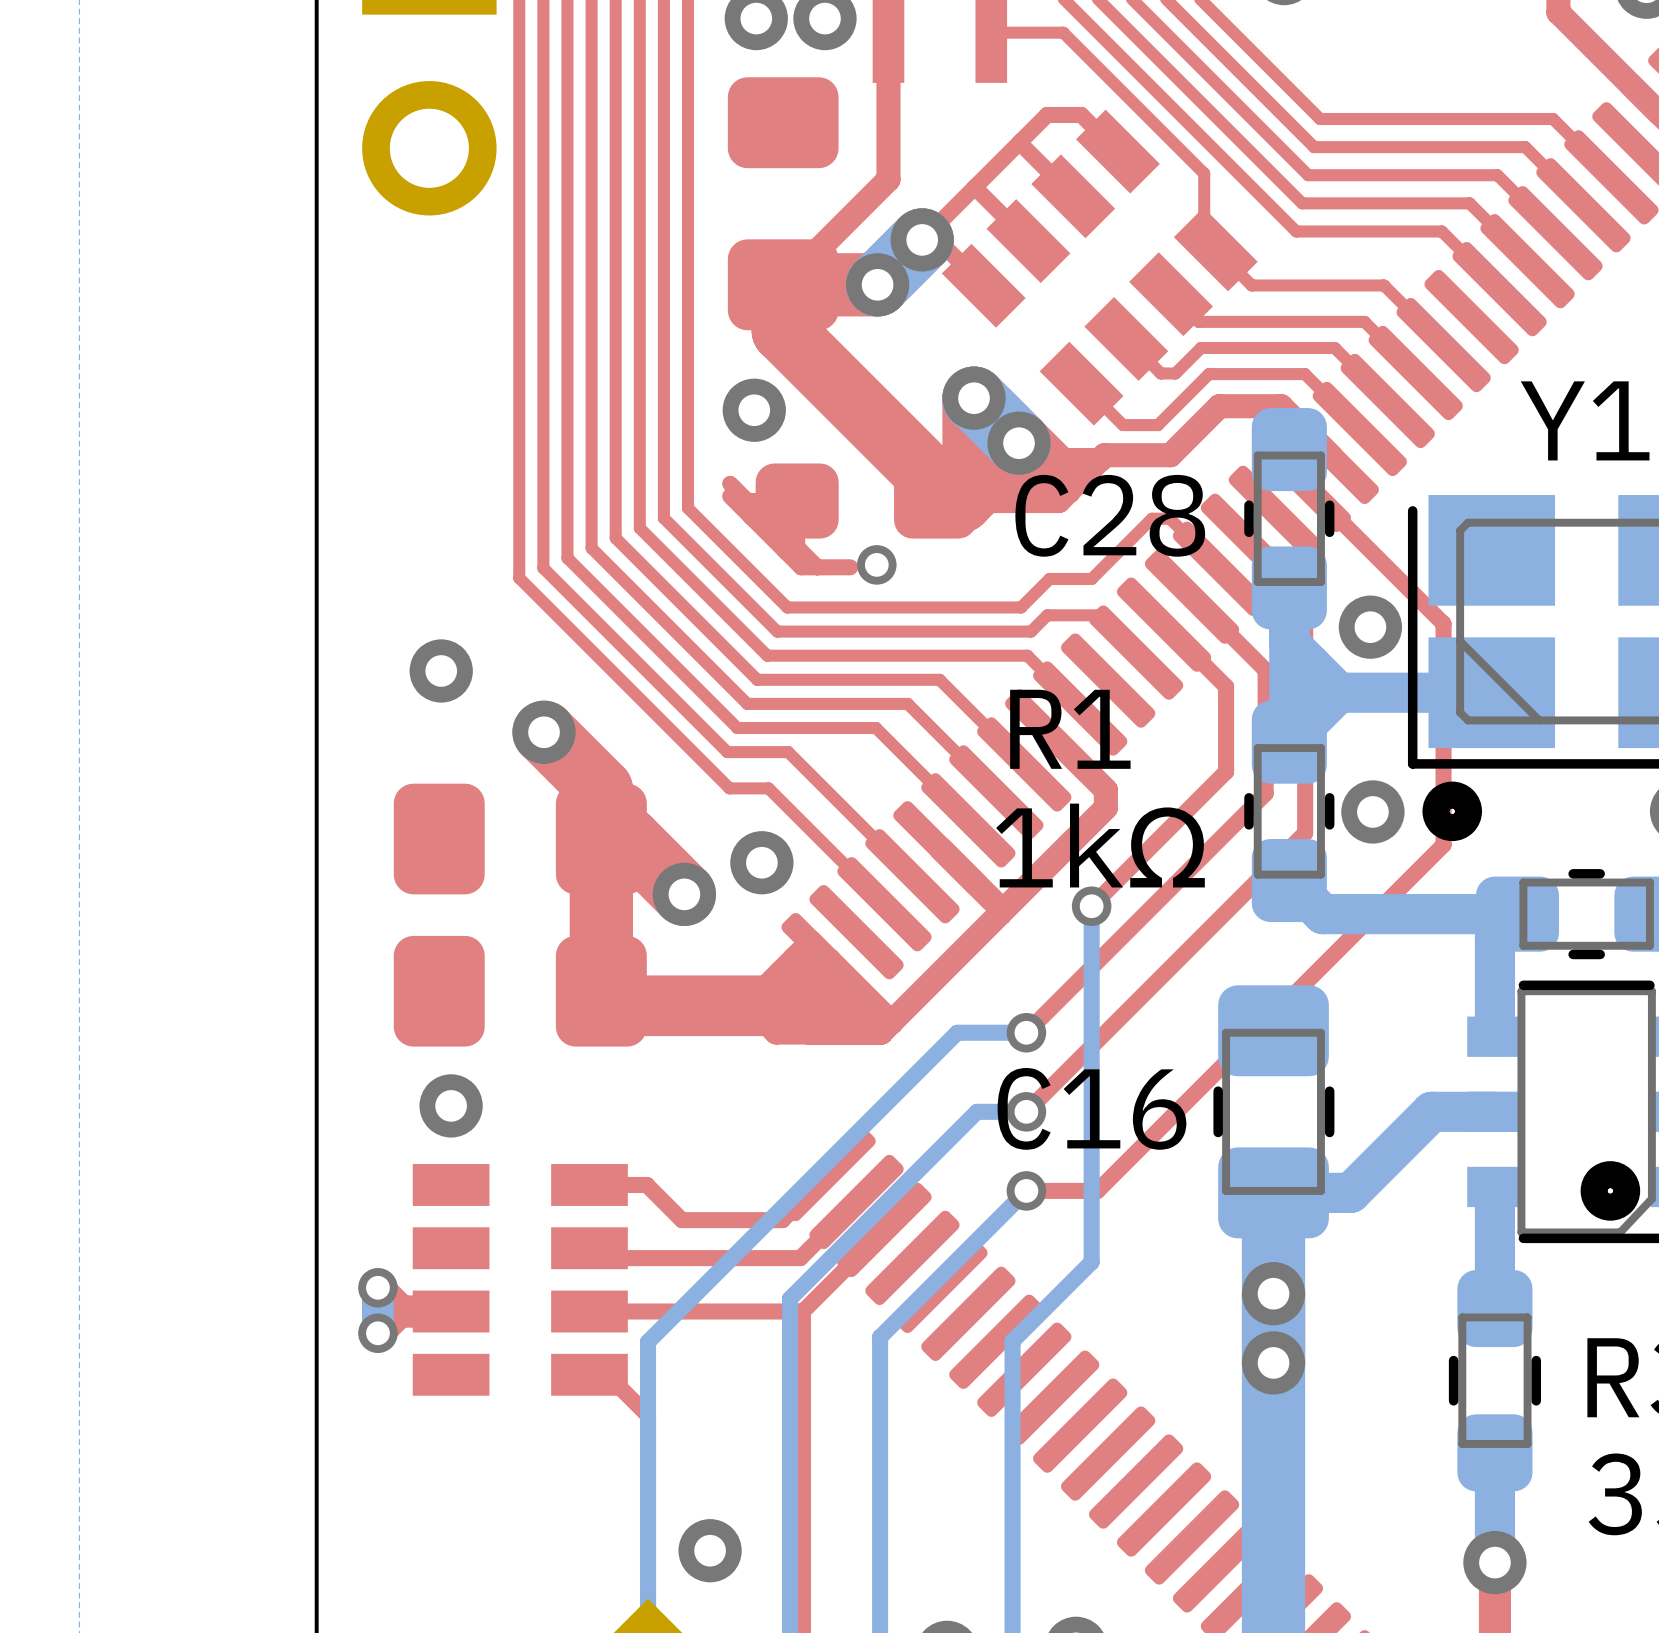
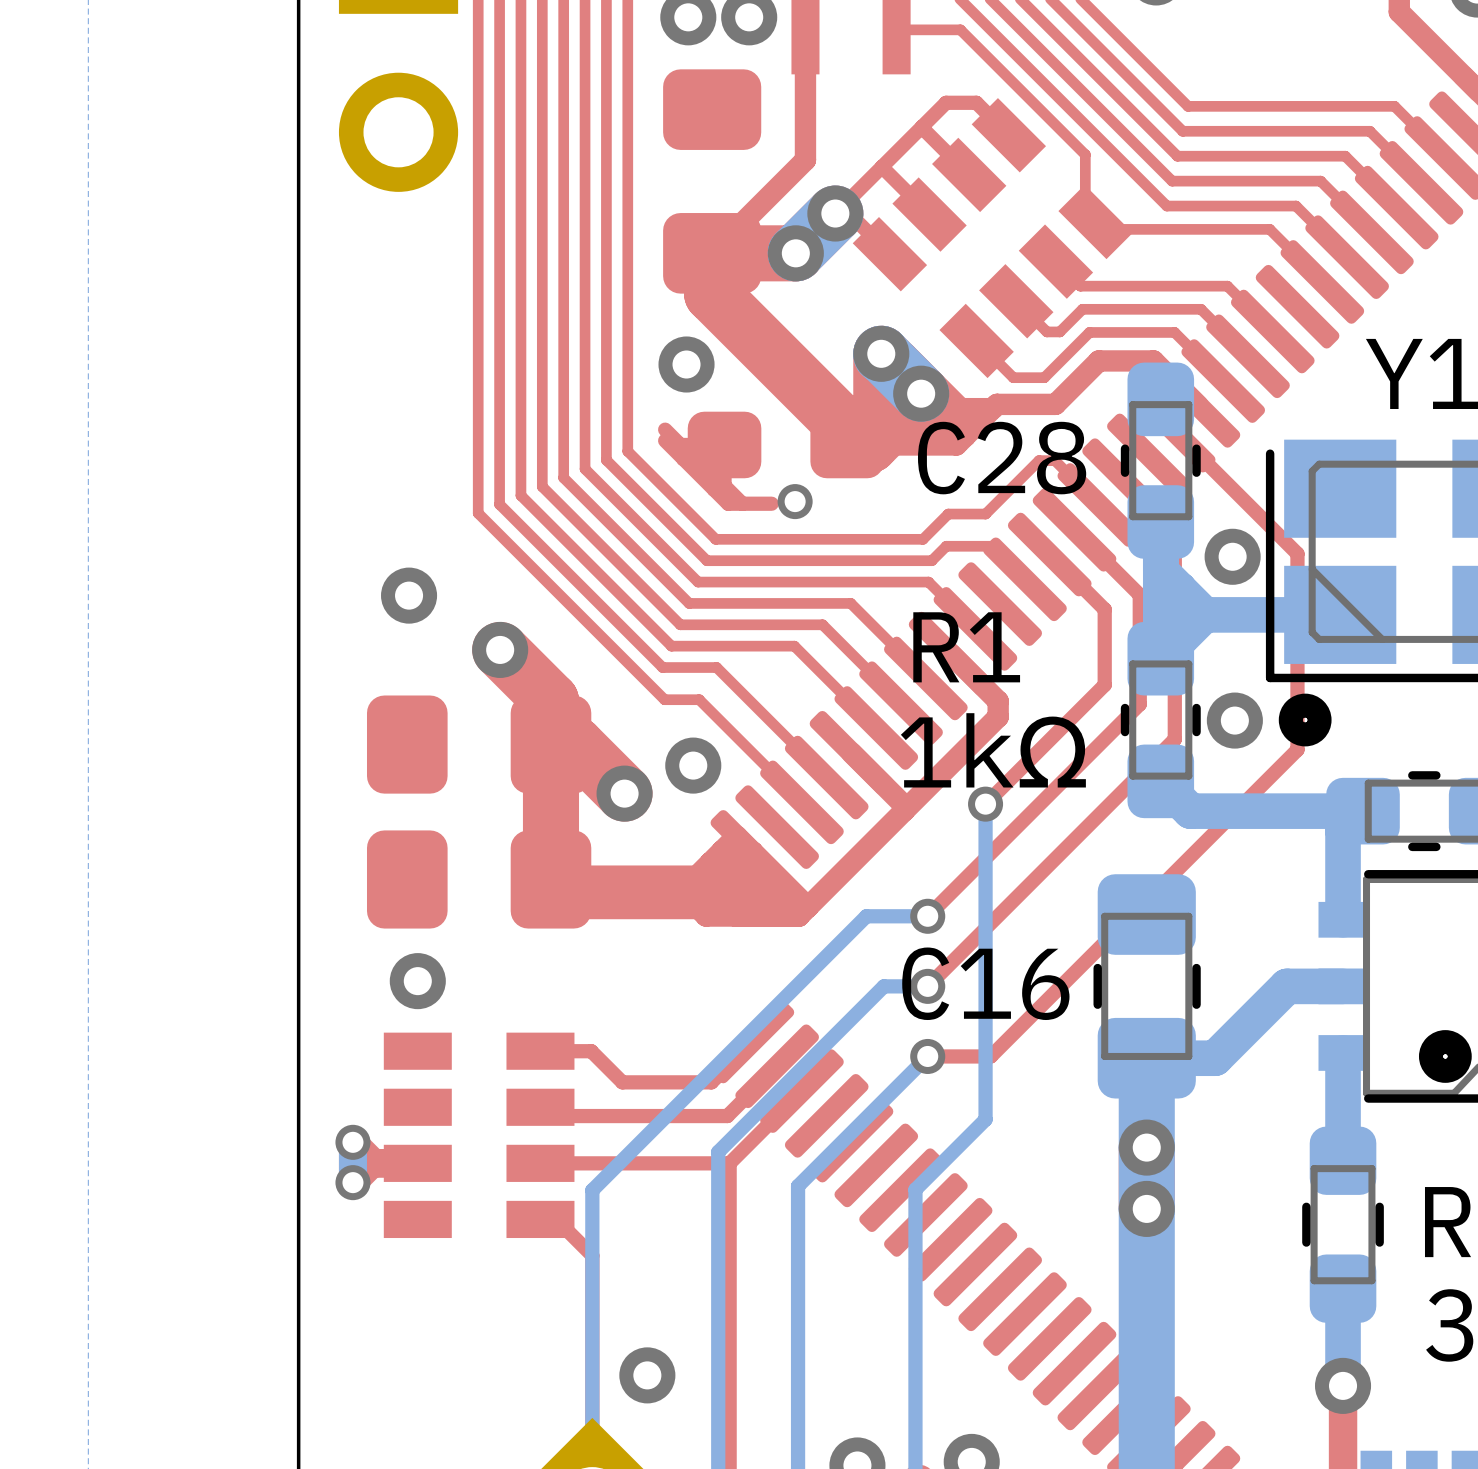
top track: (1224, 257) (1251, 285) (1384, 285) (1443, 345) -> (1102, 229) (1269, 229) (1322, 281)

